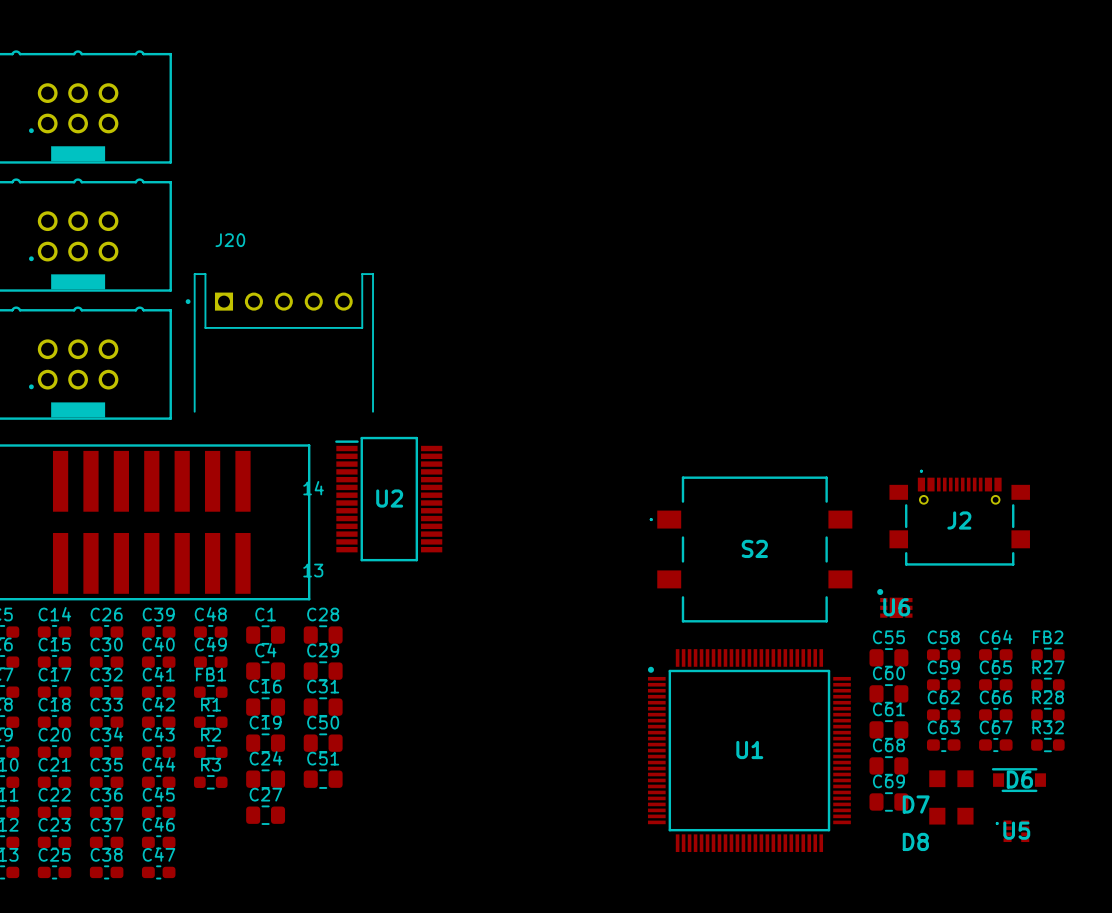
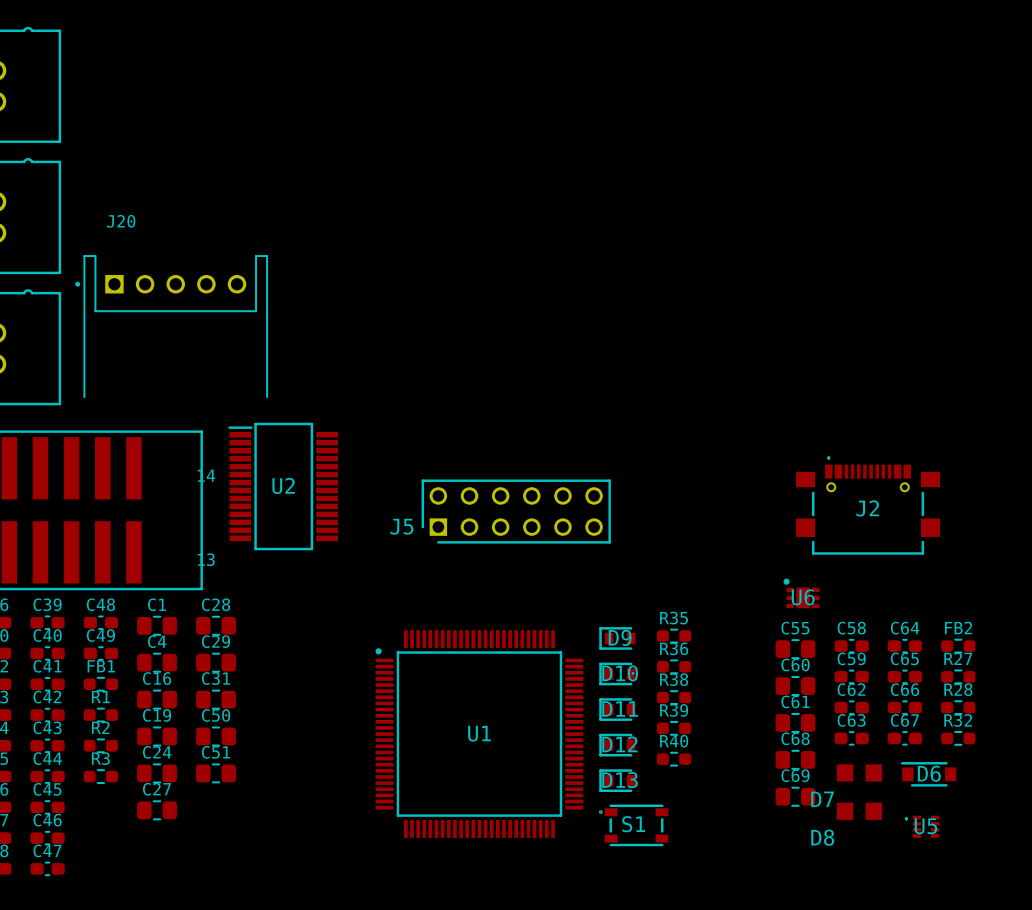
J5: none -> (516, 511)
S2: (751, 549) -> none
R35: none -> (674, 636)
D9: none -> (617, 638)
R36: none -> (674, 666)
D10: none -> (617, 674)
R38: none -> (674, 697)
D11: none -> (617, 709)
R39: none -> (674, 728)
U1 position: (749, 750) -> (479, 734)
D12: none -> (617, 745)
R40: none -> (674, 759)
D13: none -> (617, 780)
S1: none -> (633, 825)

